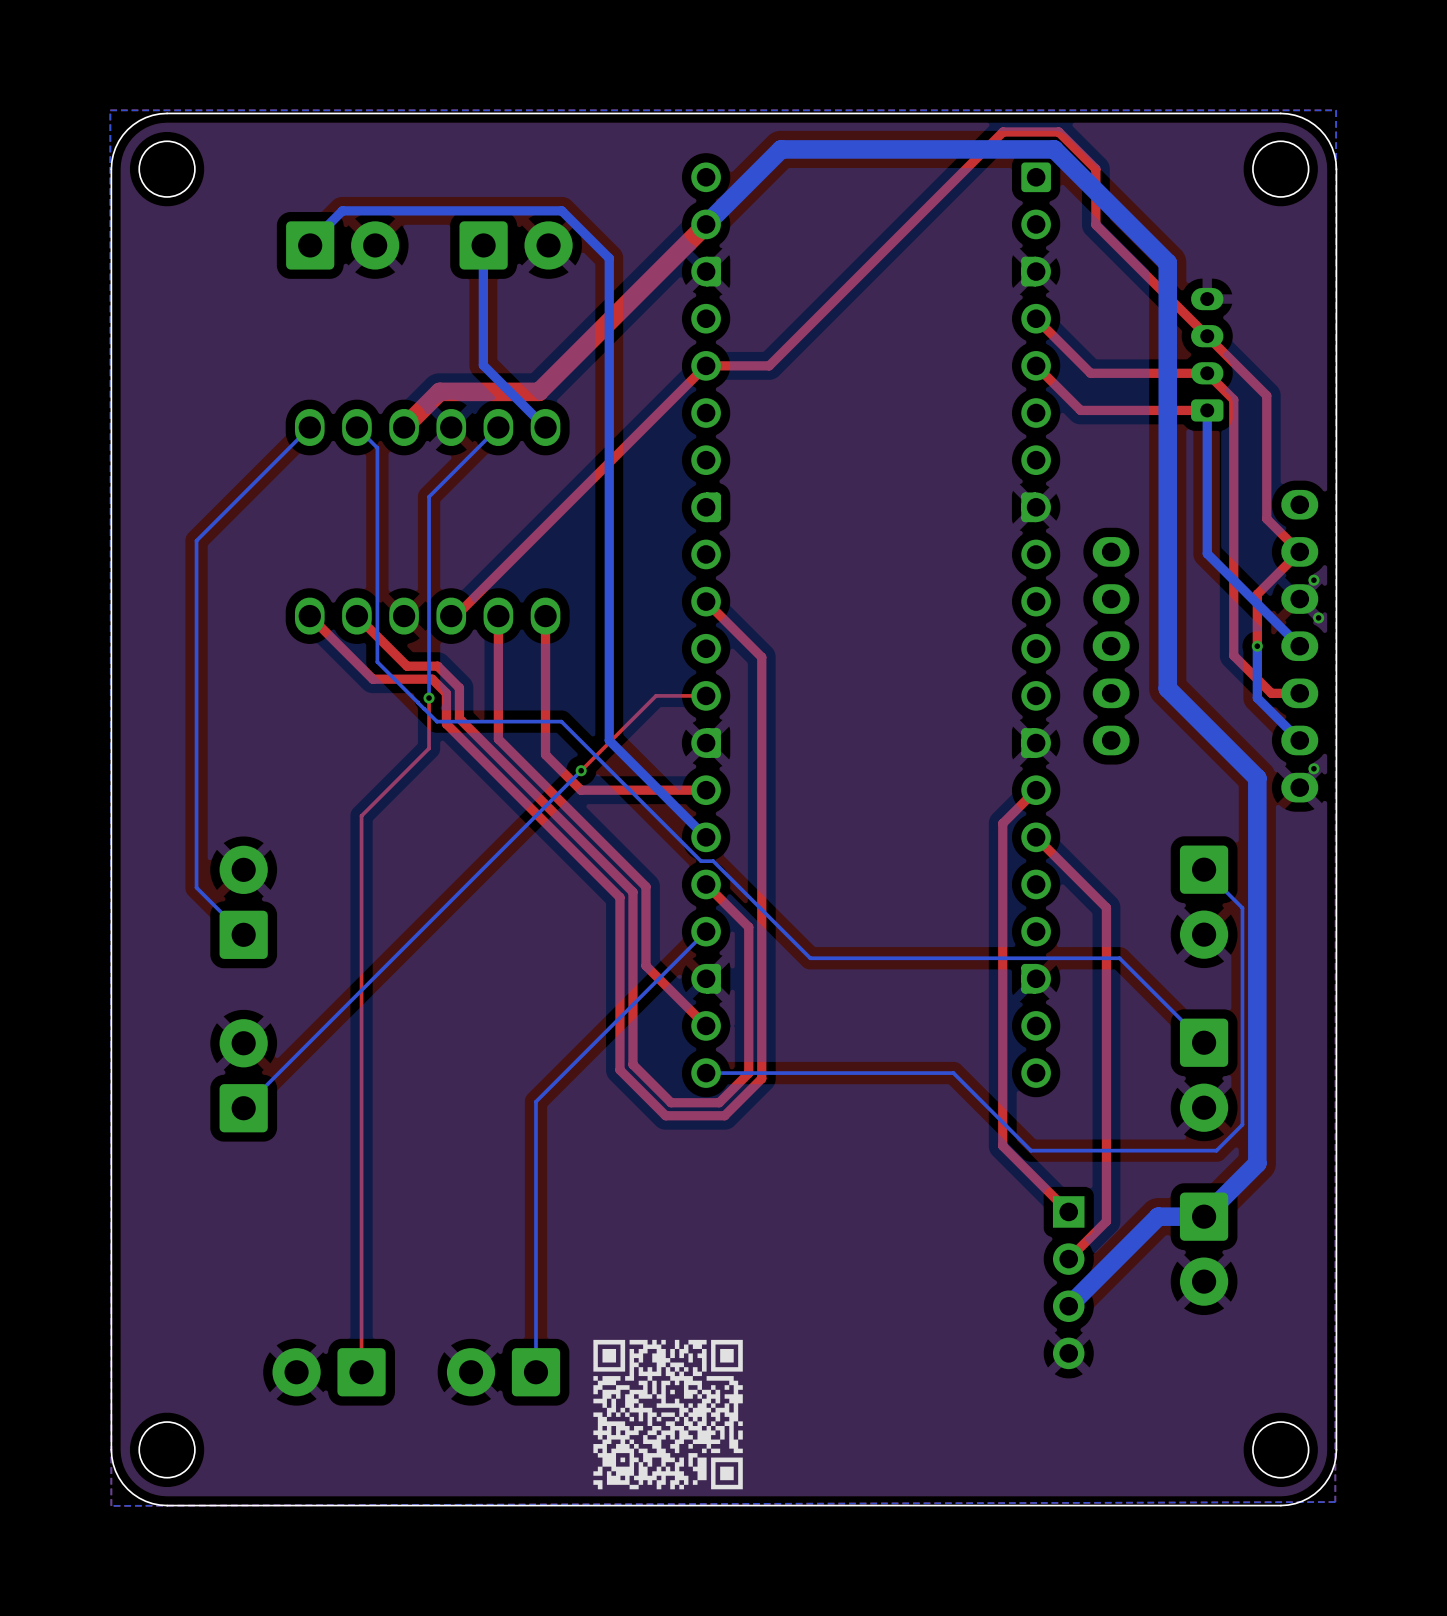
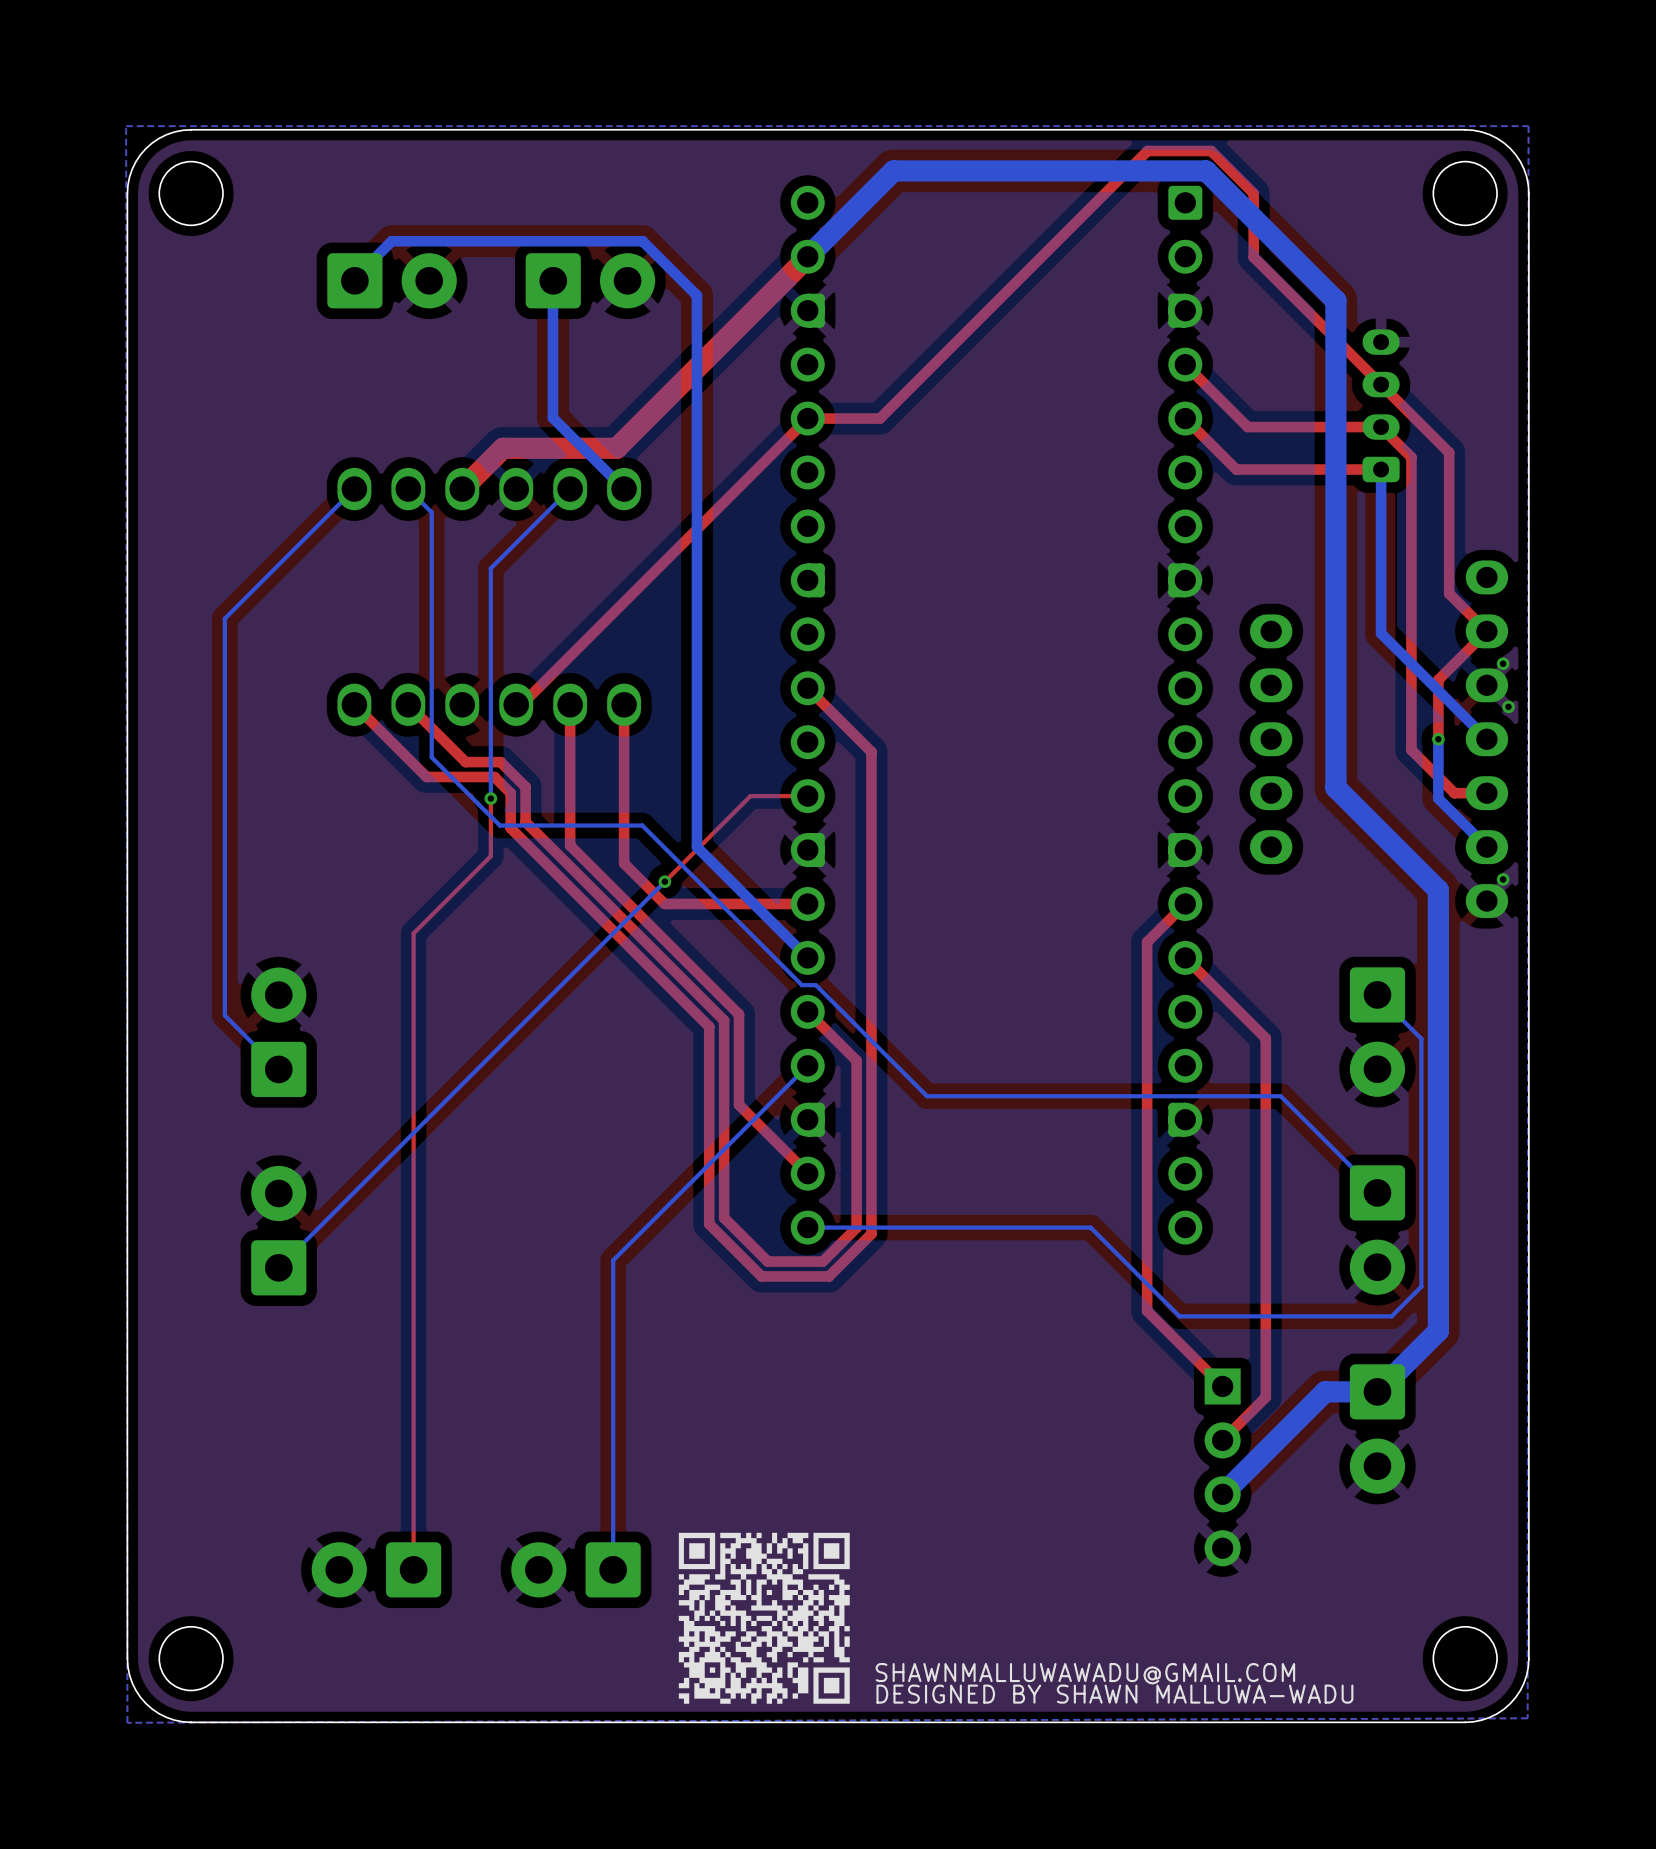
text: none -> SHAWNMALLUWAWADU@GMAIL.COM (1085, 1673)
text: none -> DESIGNED BY SHAWN MALLUWA-WADU (1114, 1694)

